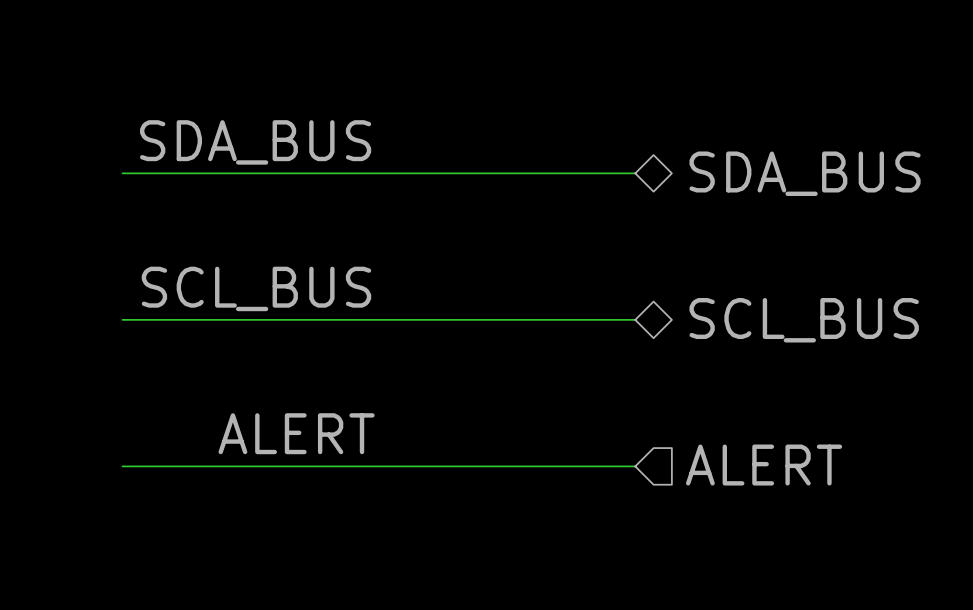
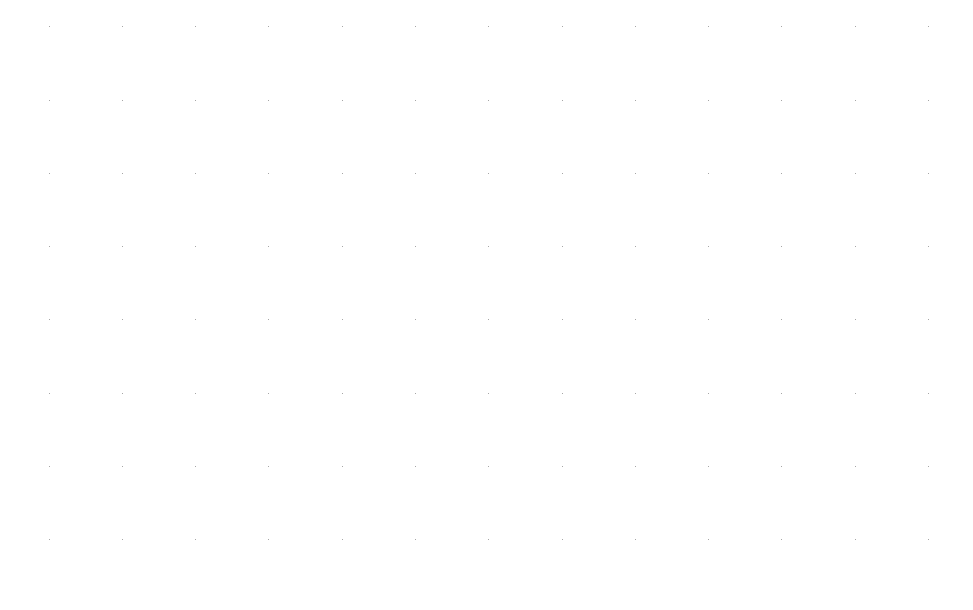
label: SDA_BUS (255, 142) -> none
wire: (122, 173) (635, 173) -> none
hierarchical label: SDA_BUS (805, 173) -> none
label: SCL_BUS (256, 288) -> none
wire: (122, 319) (635, 319) -> none
hierarchical label: SCL_BUS (804, 320) -> none
label: ALERT (296, 433) -> none
hierarchical label: ALERT (764, 465) -> none
wire: (122, 466) (635, 466) -> none

